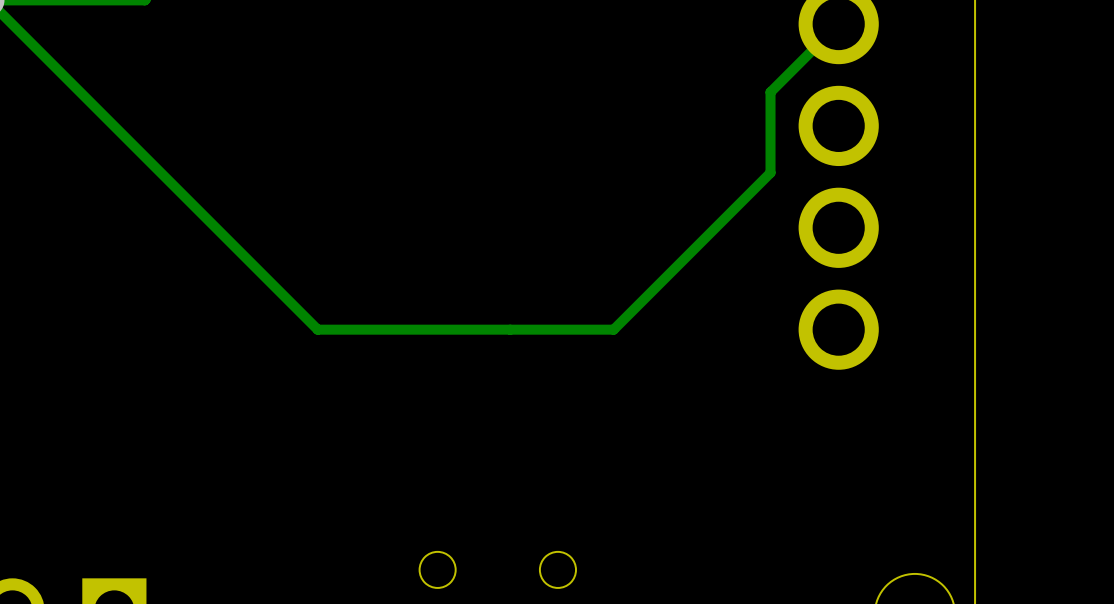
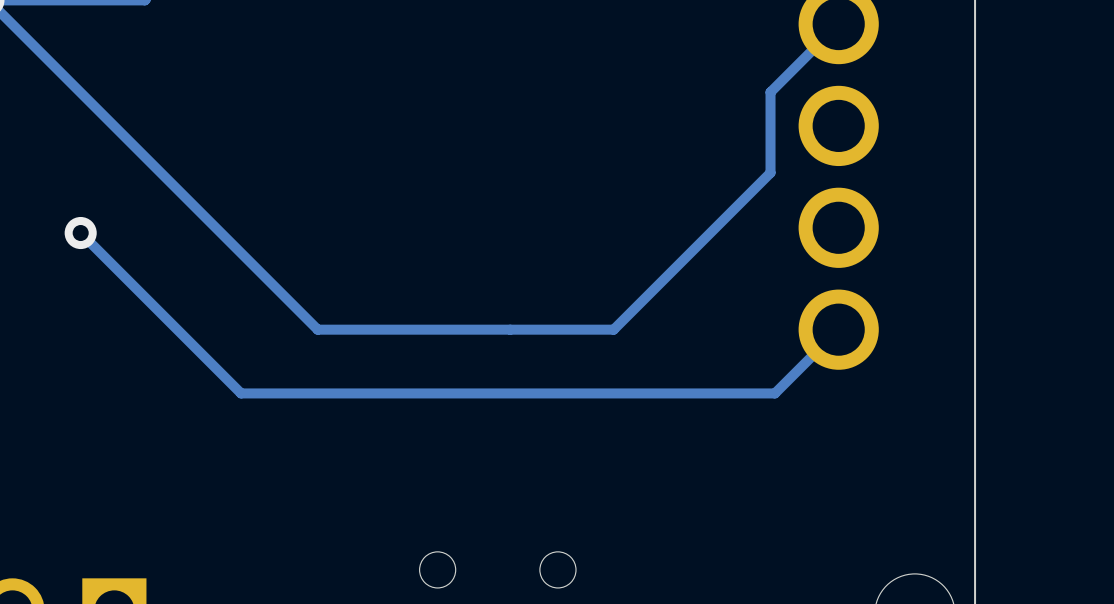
track: none -> (80, 233) (241, 393) (774, 393) (838, 329)
via: none -> (80, 233)

